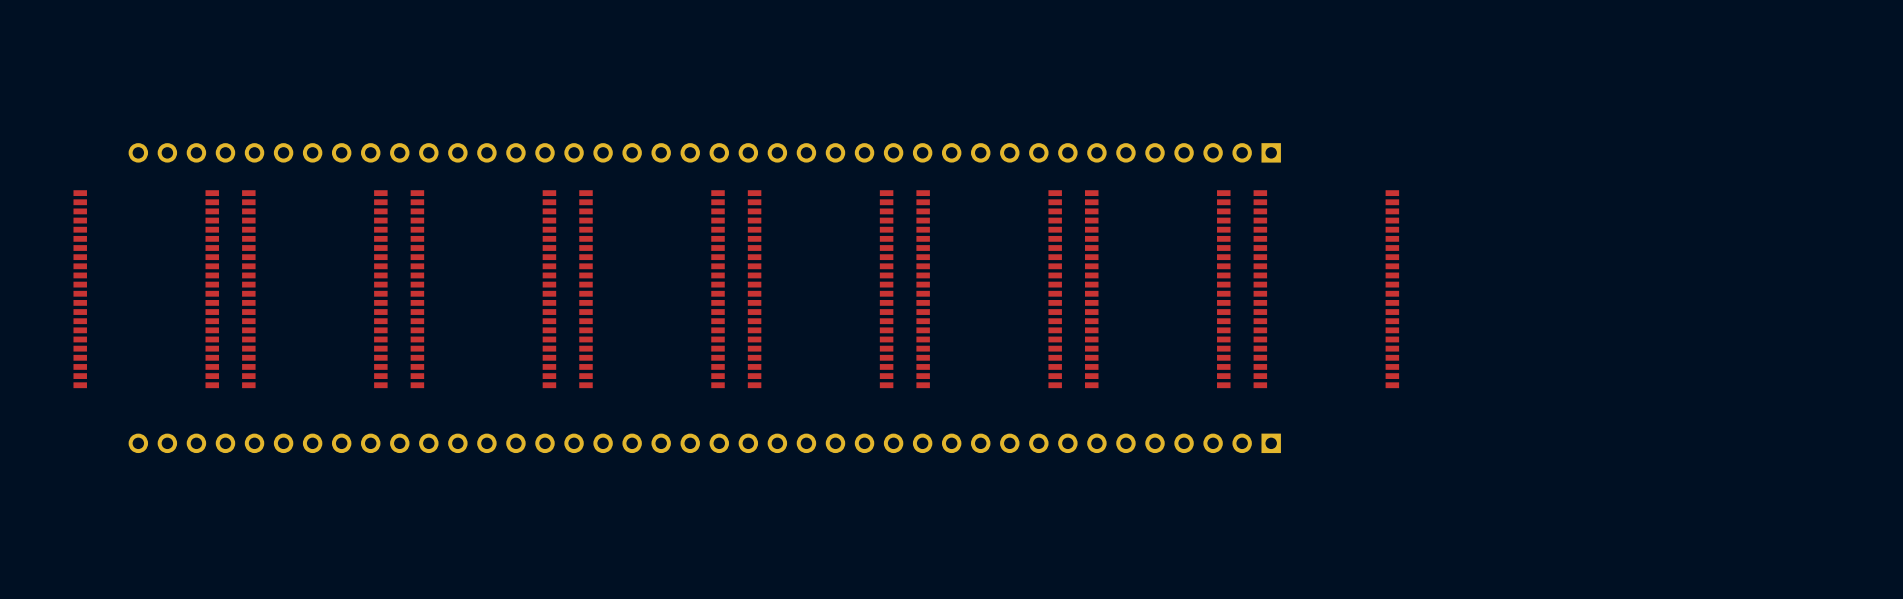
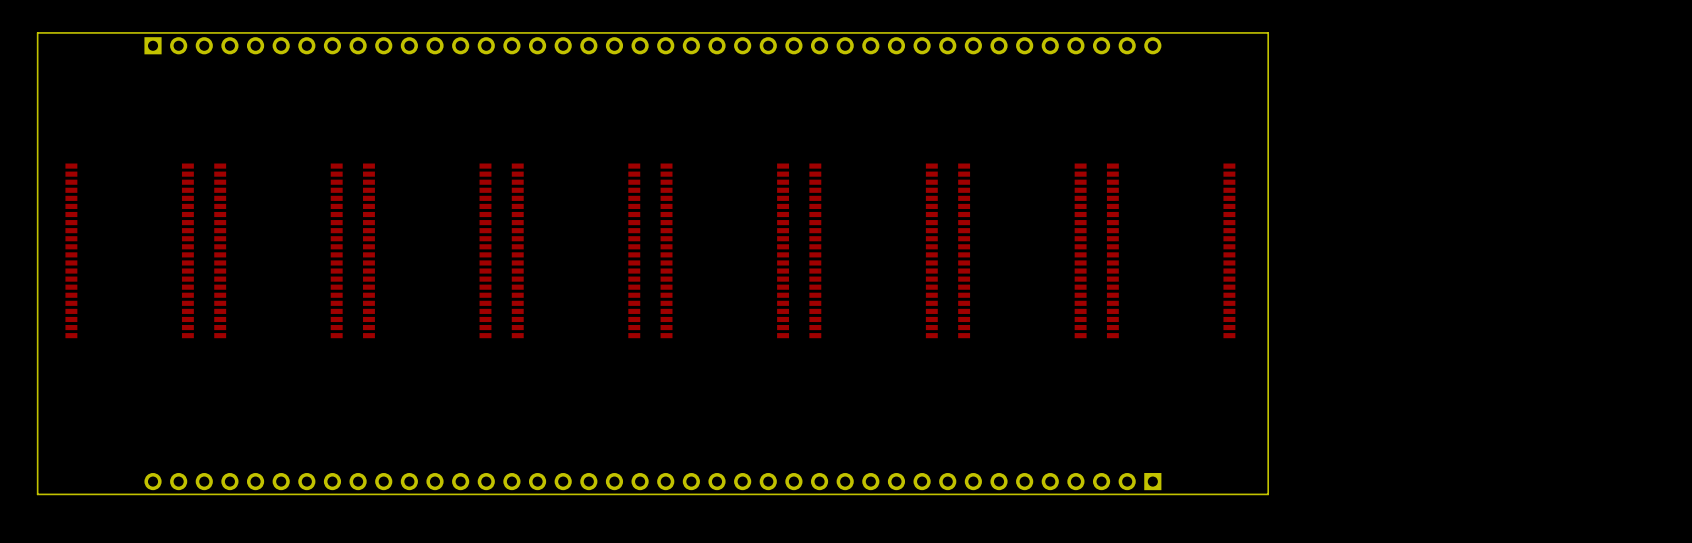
board edge: none -> (1268, 32) (37, 32) (37, 494) (1268, 494) (1268, 32)
part rotation: 0° (704, 152) -> 180° (652, 45)
part position: (704, 443) -> (652, 481)

